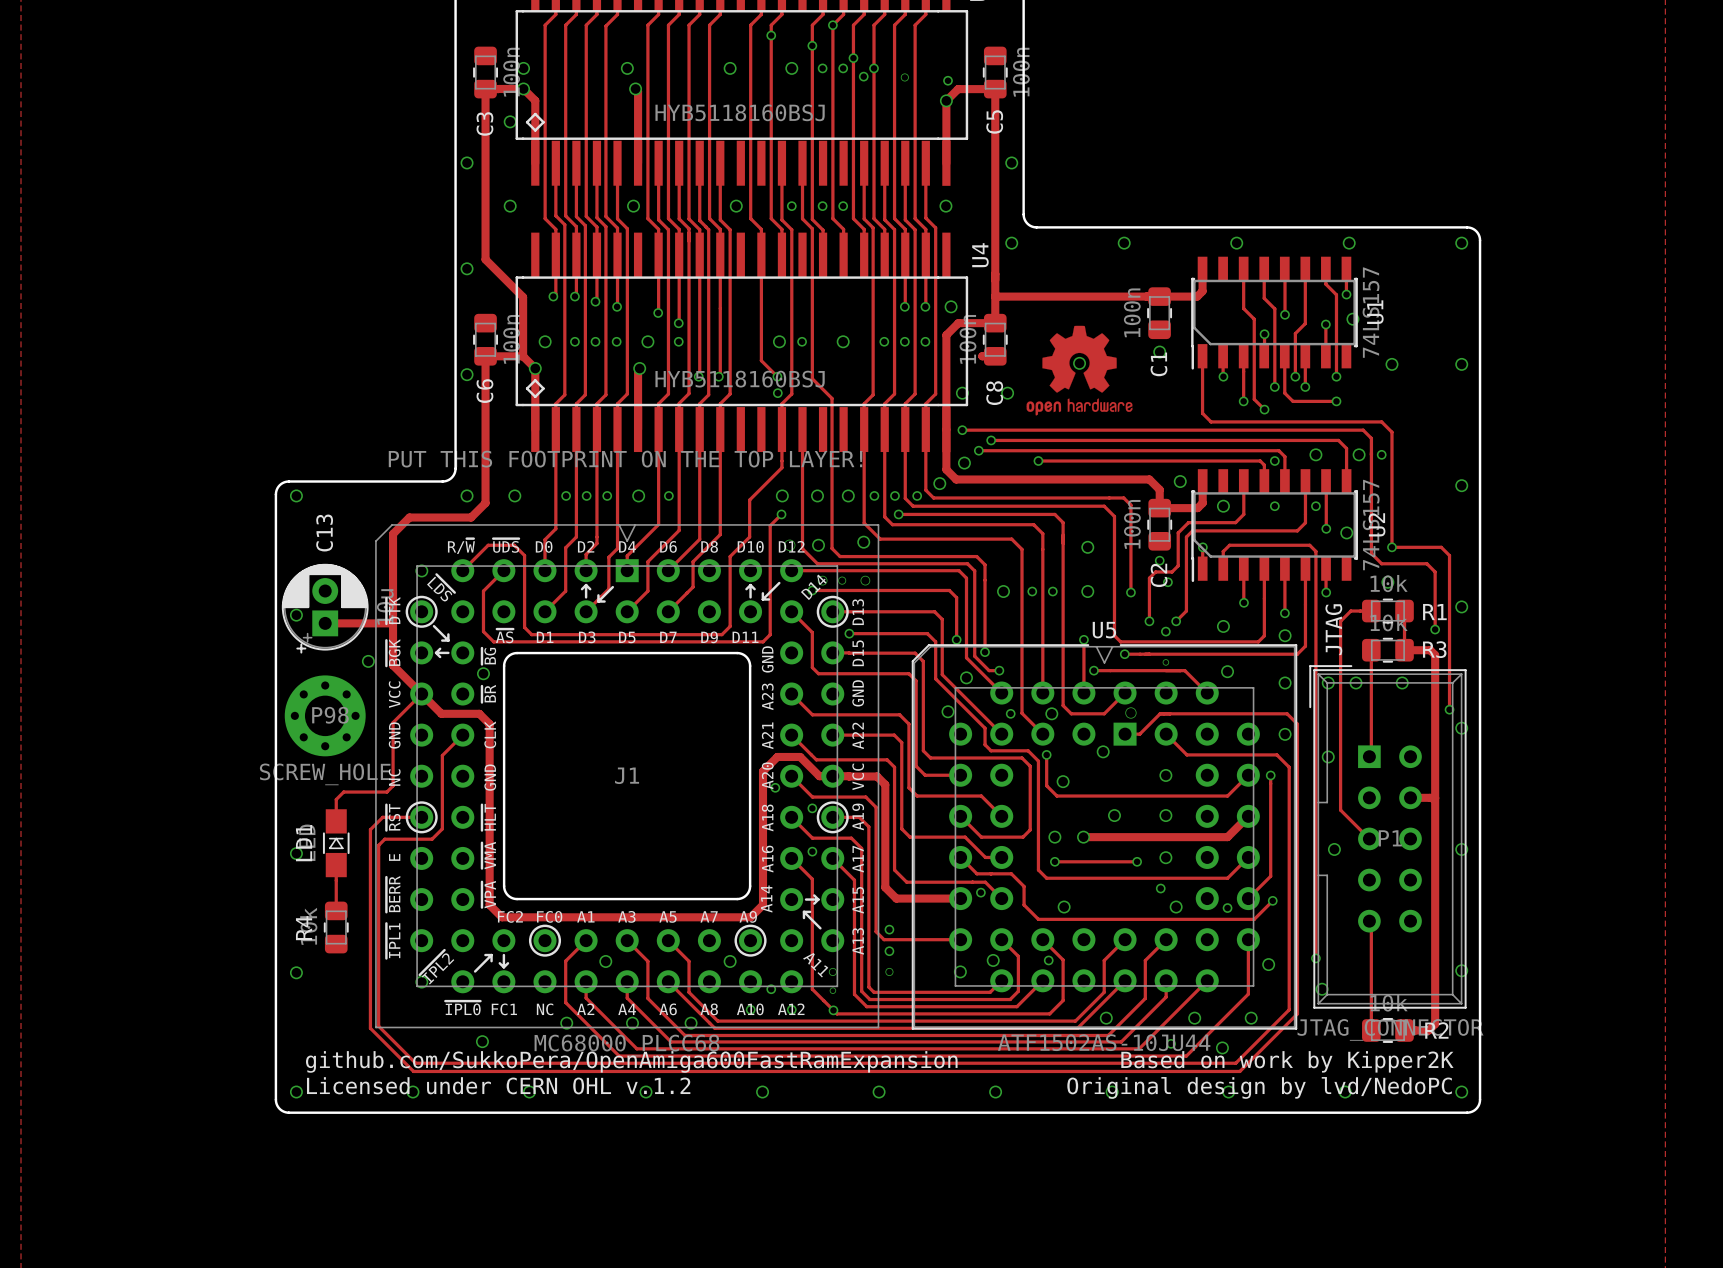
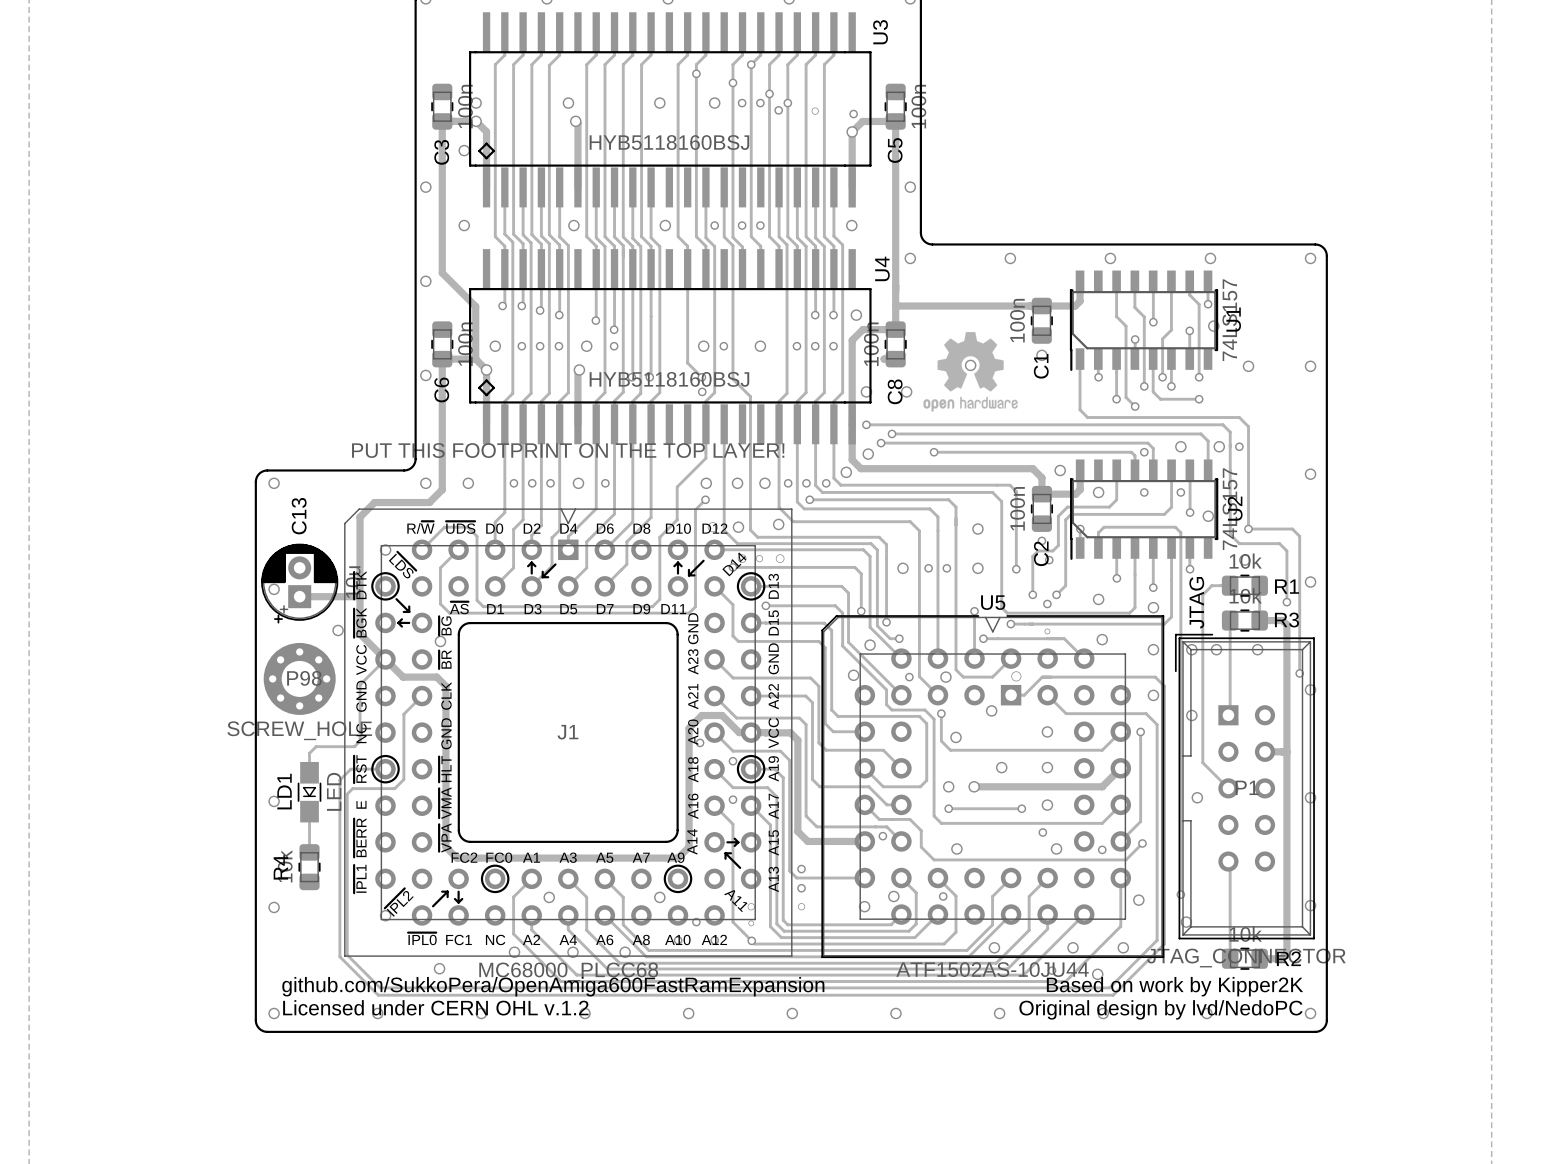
LD1 rotation: 0° (336, 843) -> 180° (309, 792)

